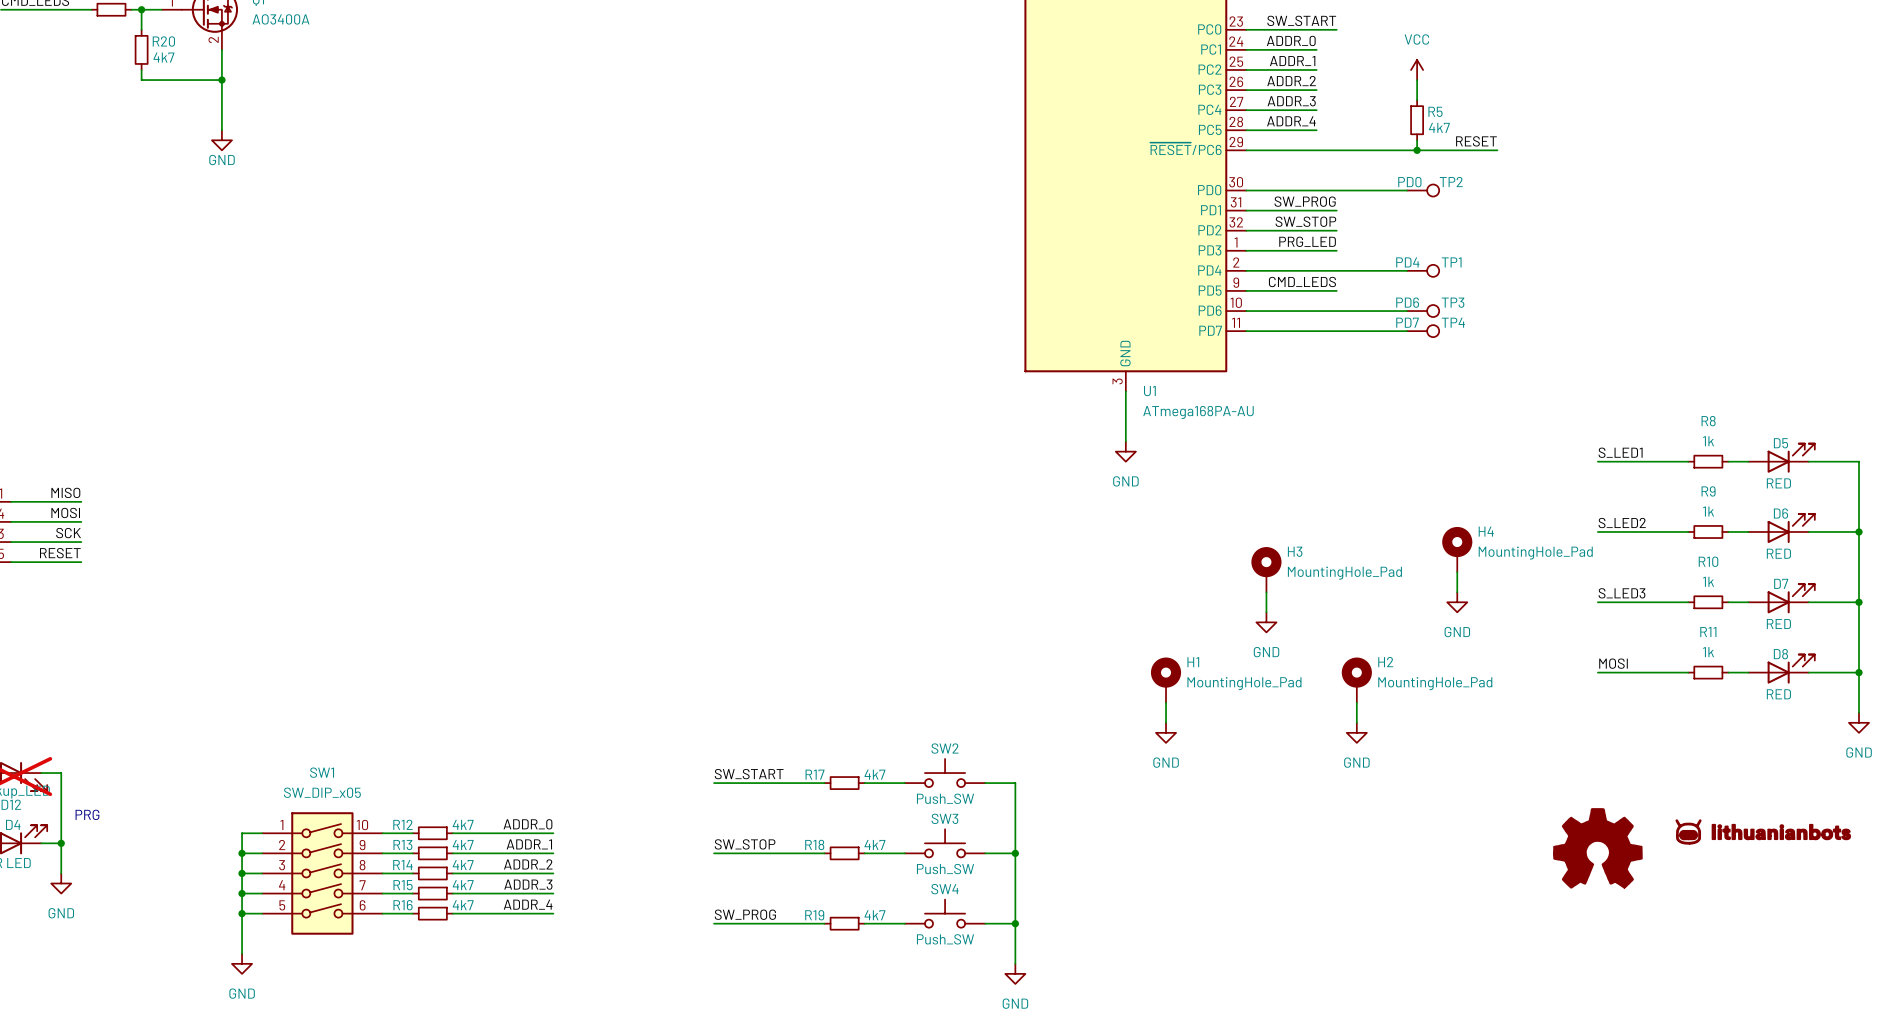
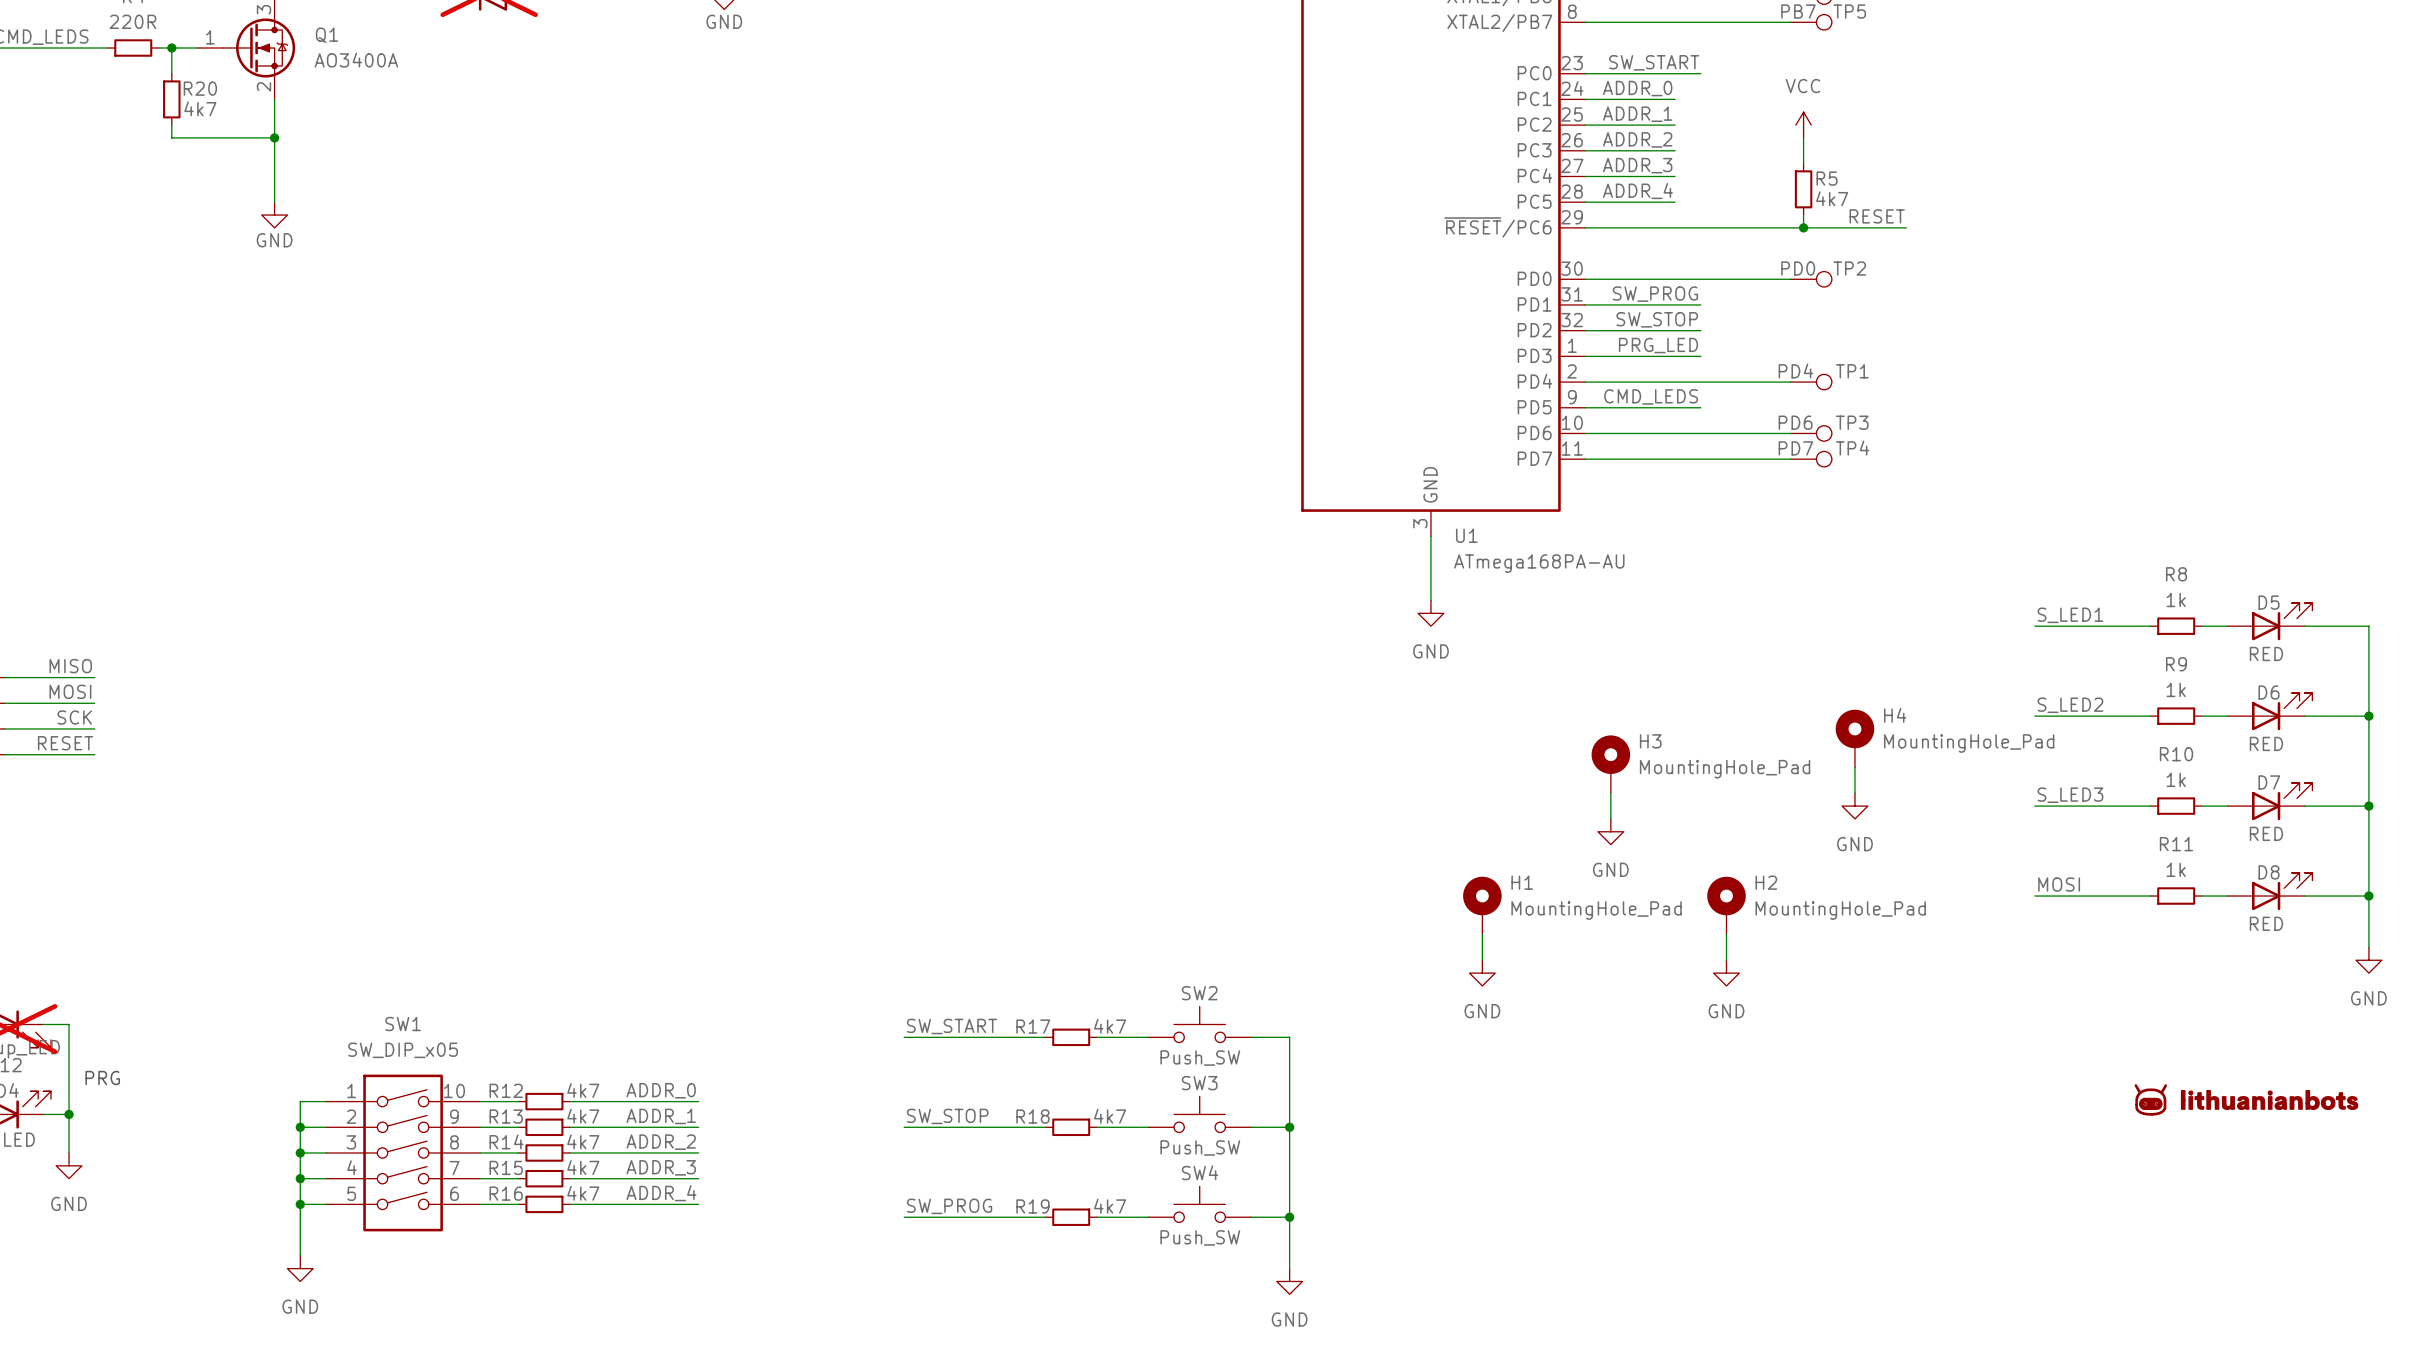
power symbol: (1597, 848) -> none

